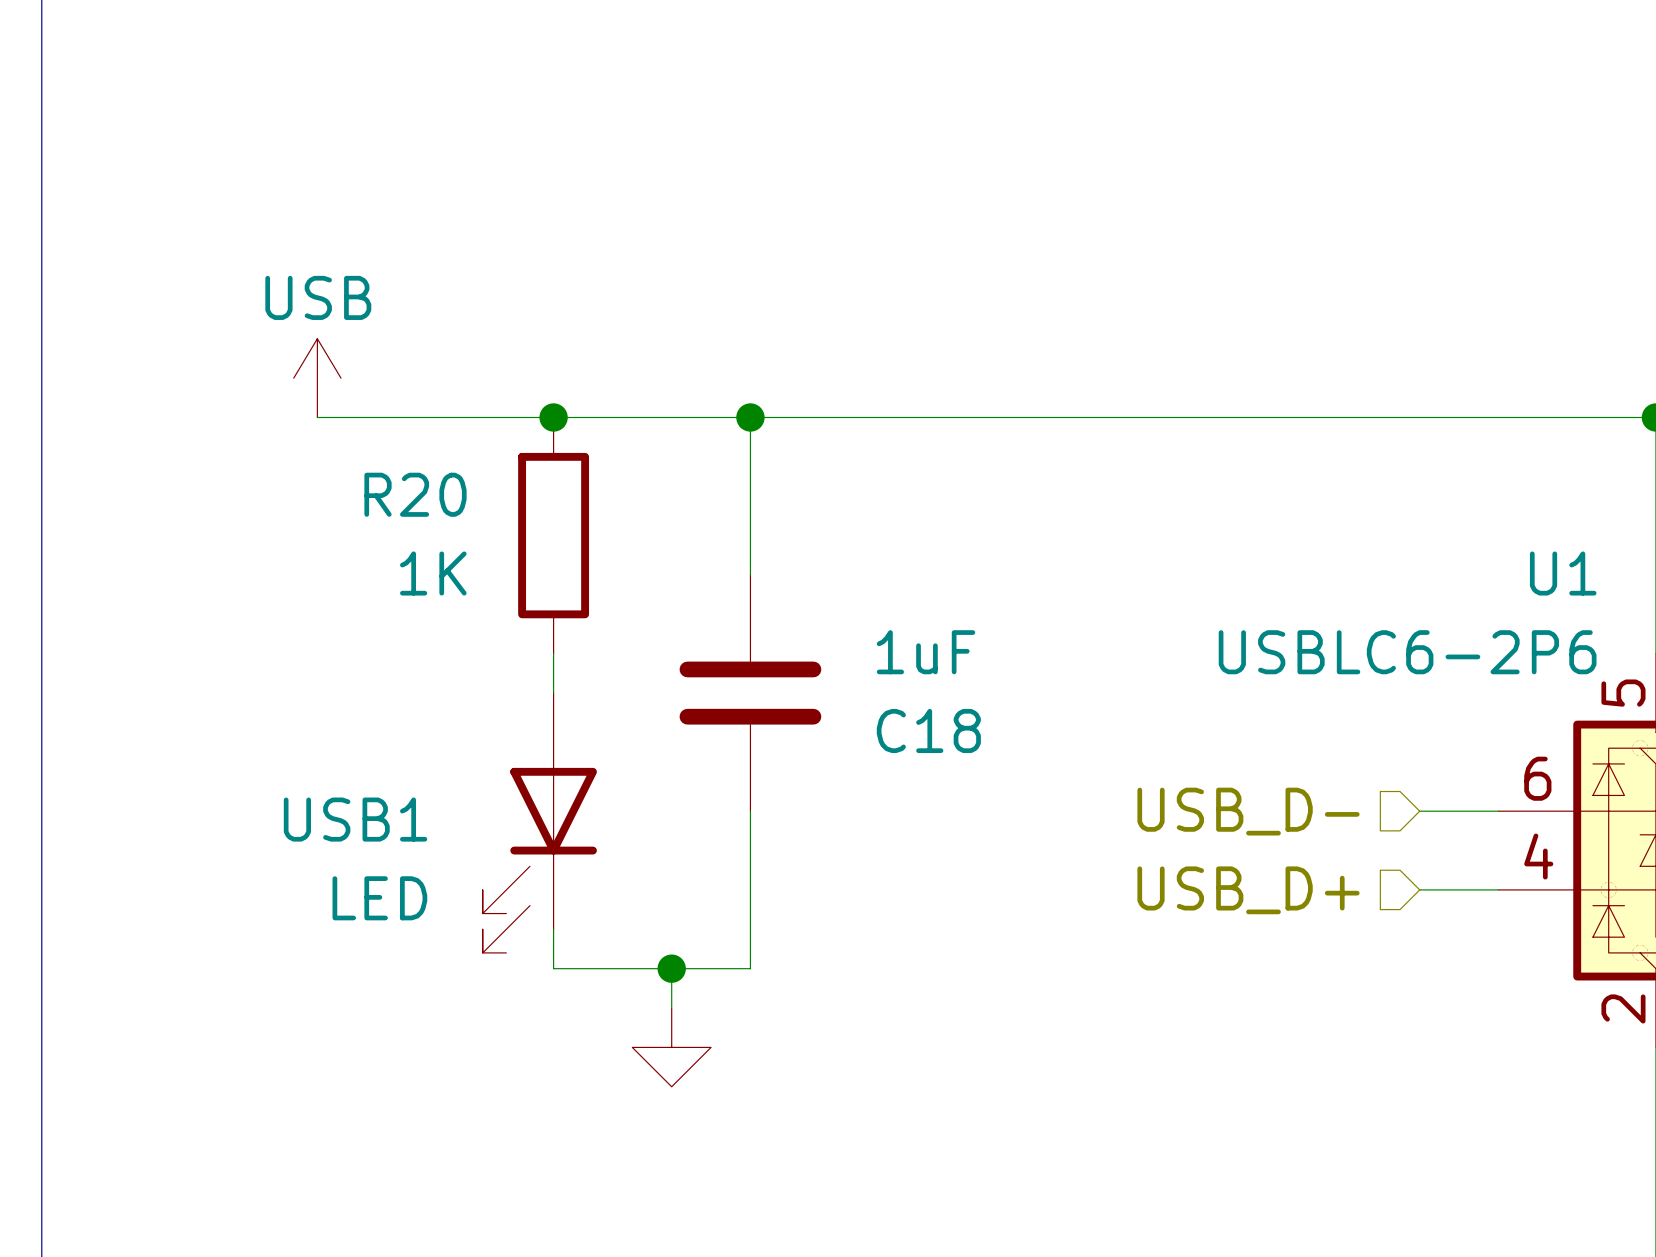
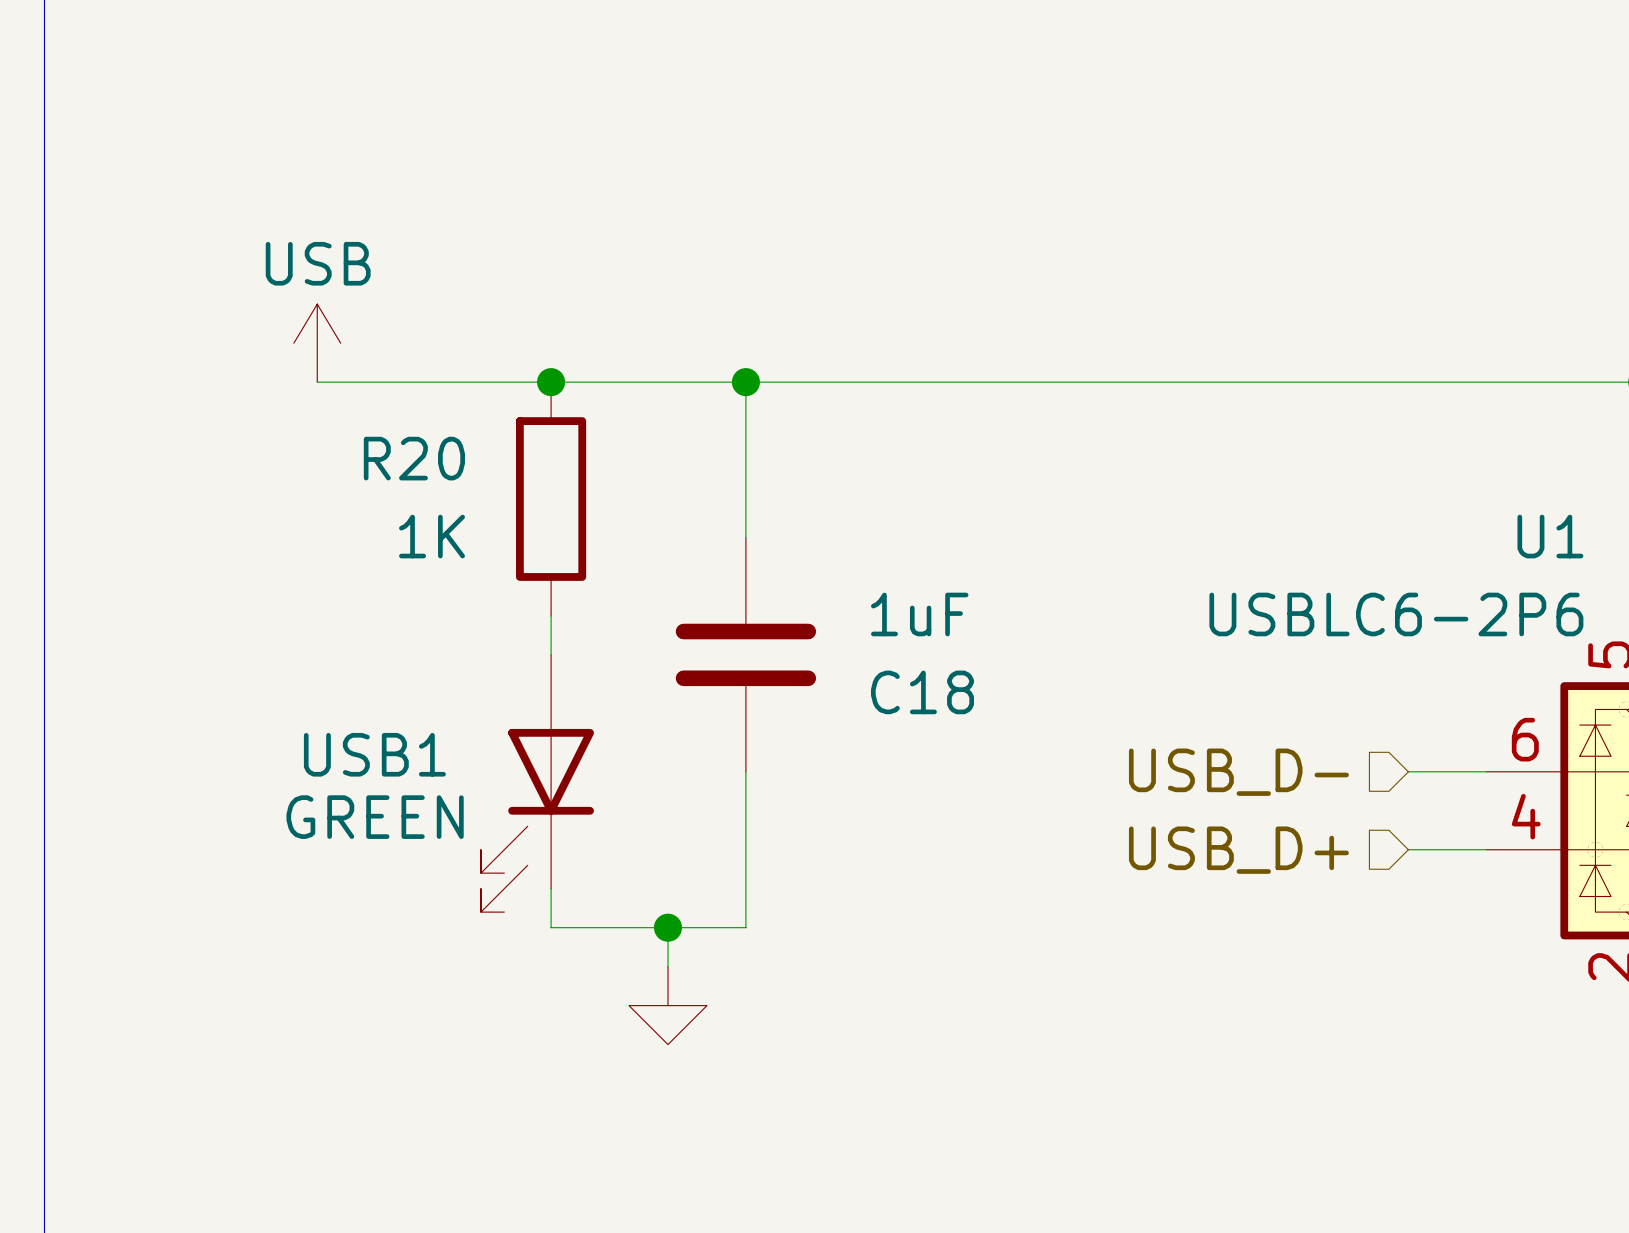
USB1 name position: USB1 (355, 819) -> USB1 (374, 754)
USB1 value: LED (379, 898) -> GREEN (375, 817)

